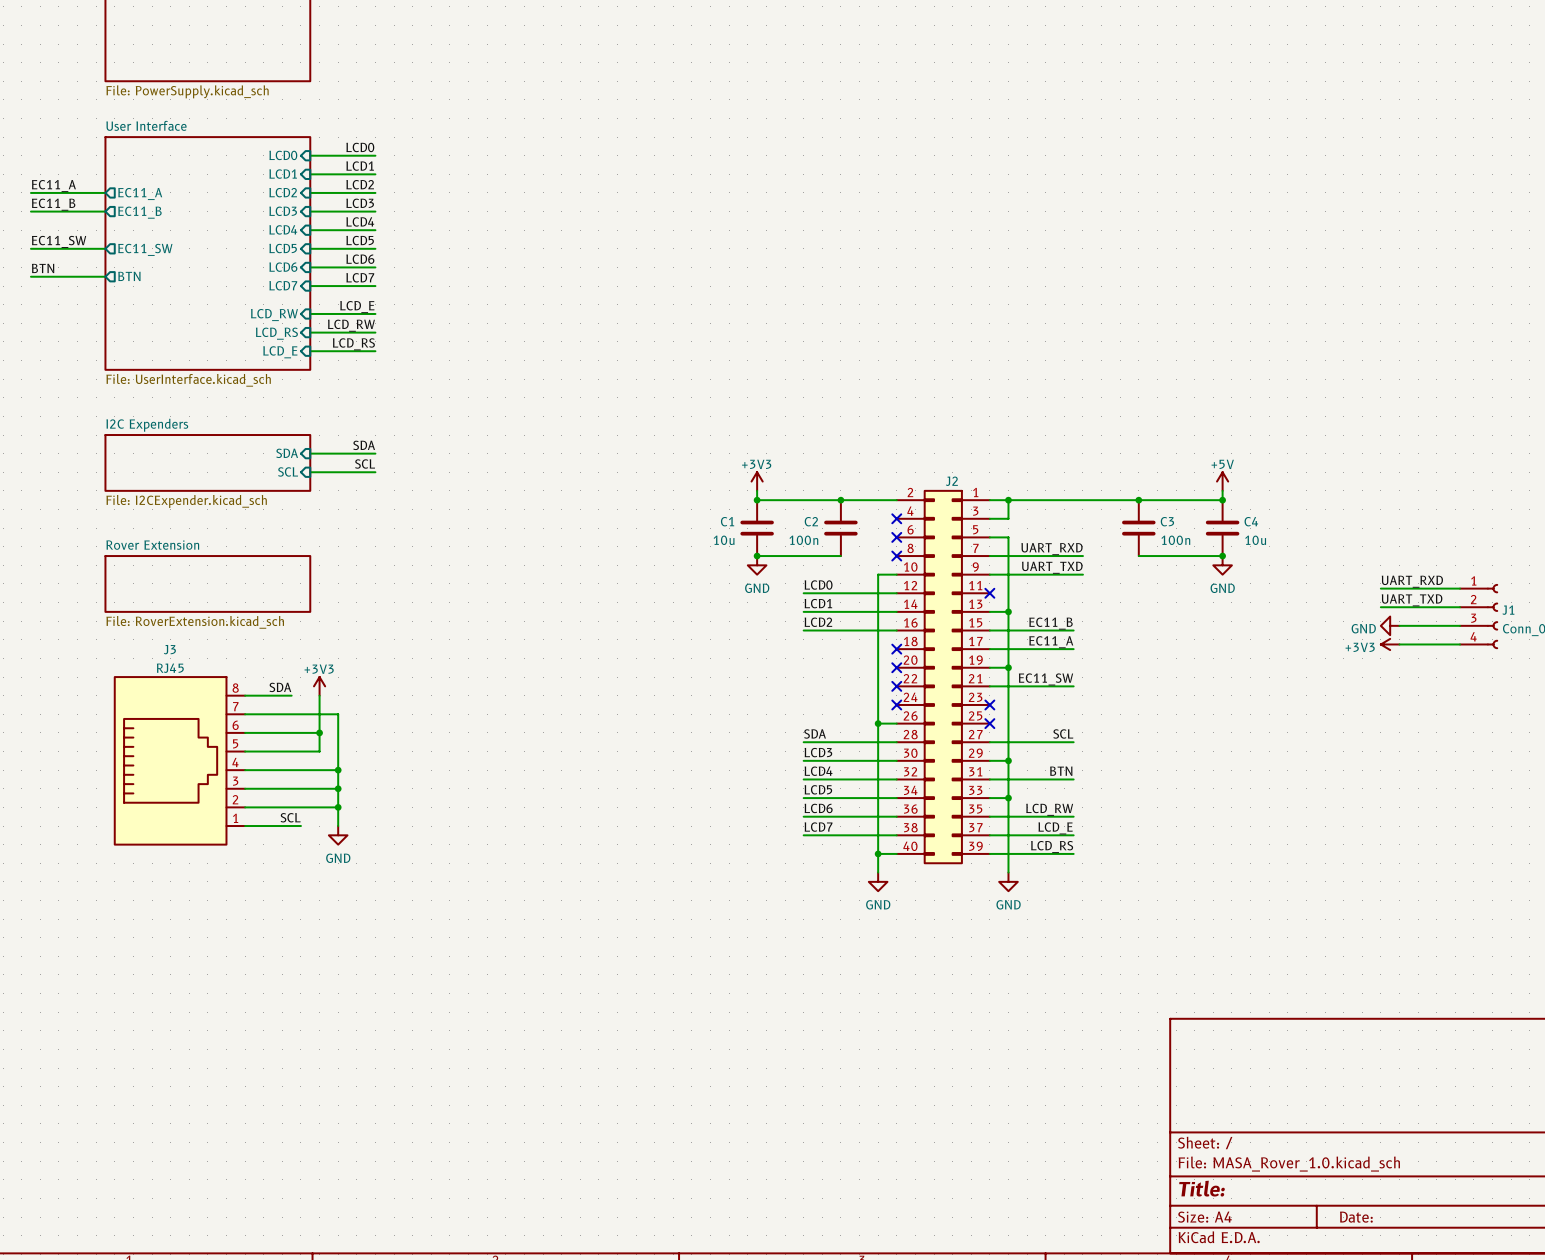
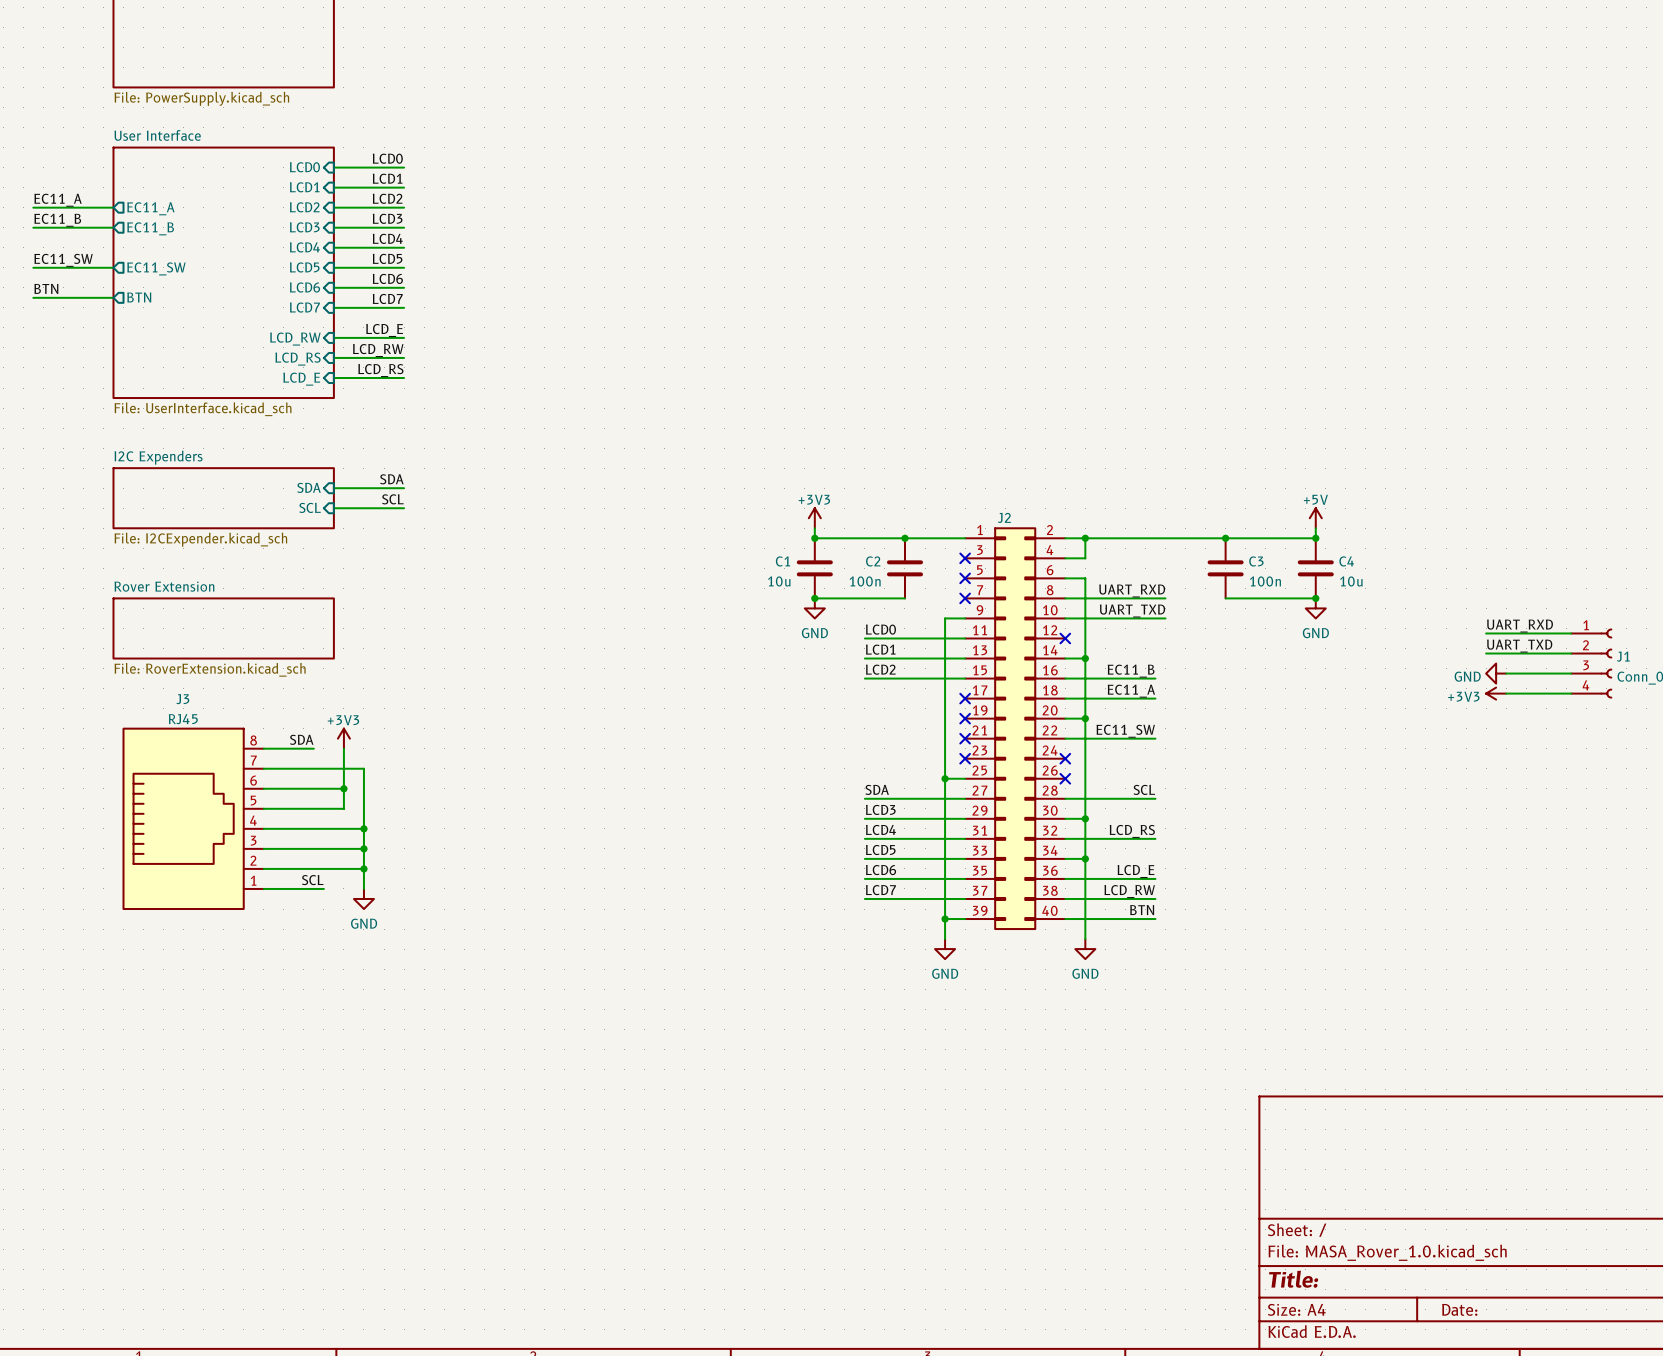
J2 flip: as is (943, 677) -> left-right (1015, 728)
label: BTN (1061, 771) -> LCD_RS (1132, 831)
label: LCD_RW (1049, 809) -> LCD_E (1136, 871)
label: LCD_E (1055, 828) -> LCD_RW (1129, 891)
label: LCD_RS (1052, 847) -> BTN (1142, 910)

